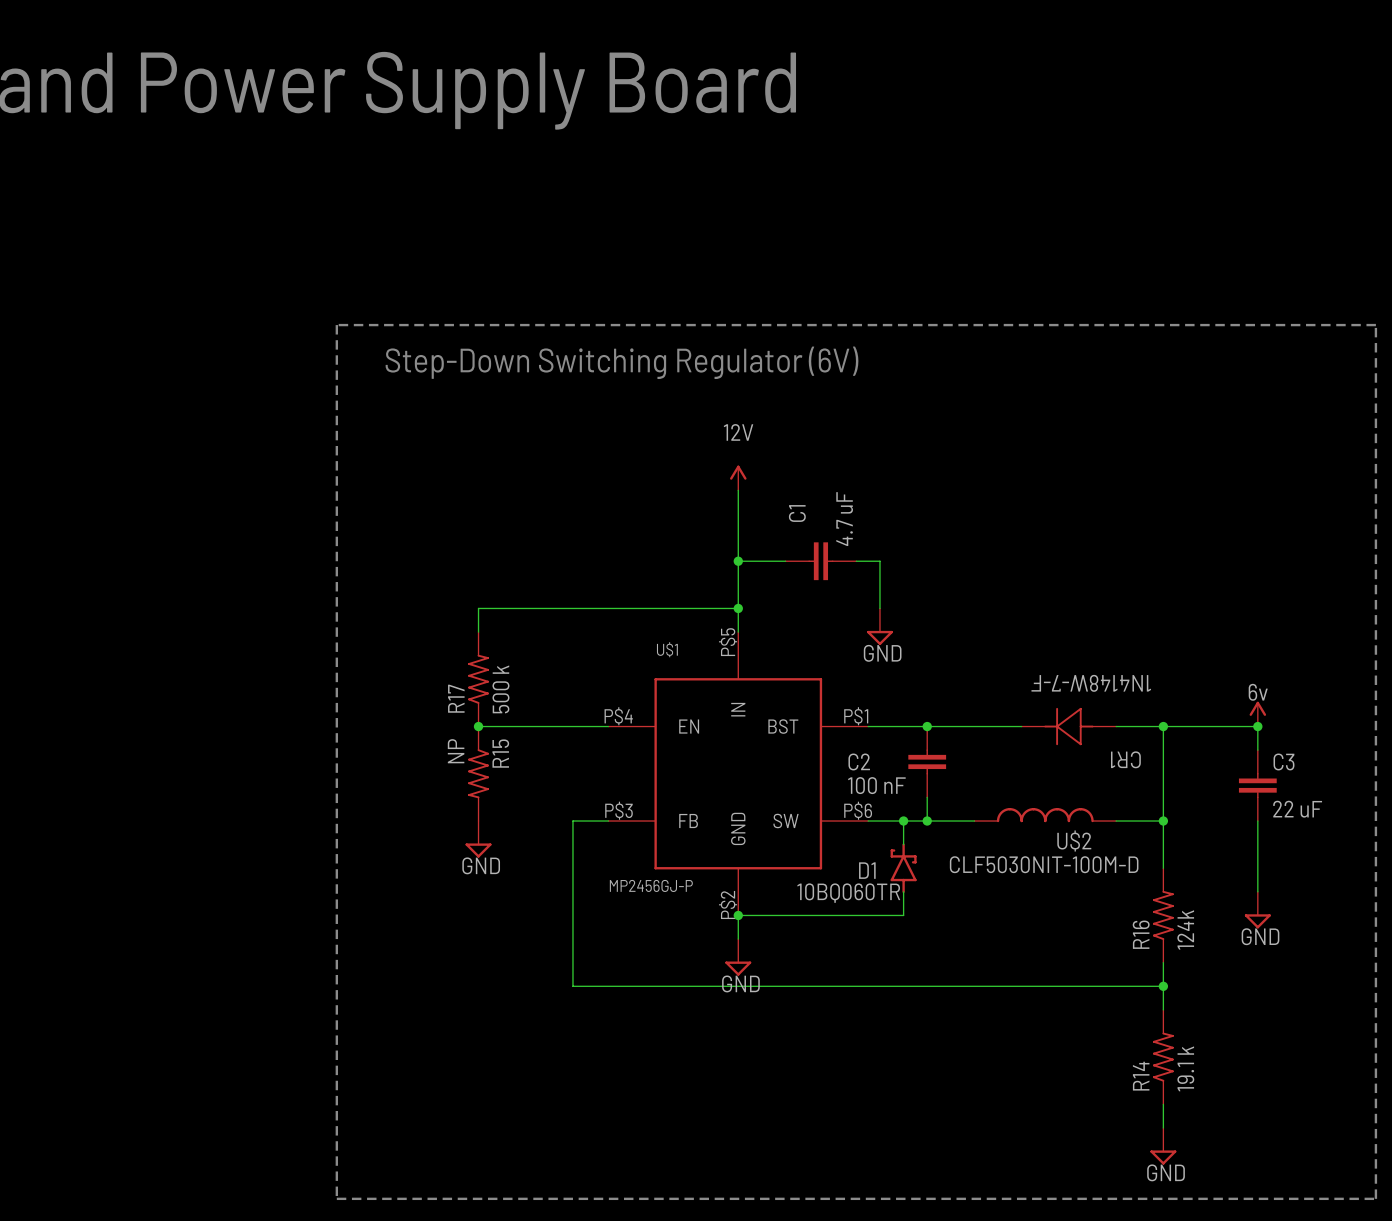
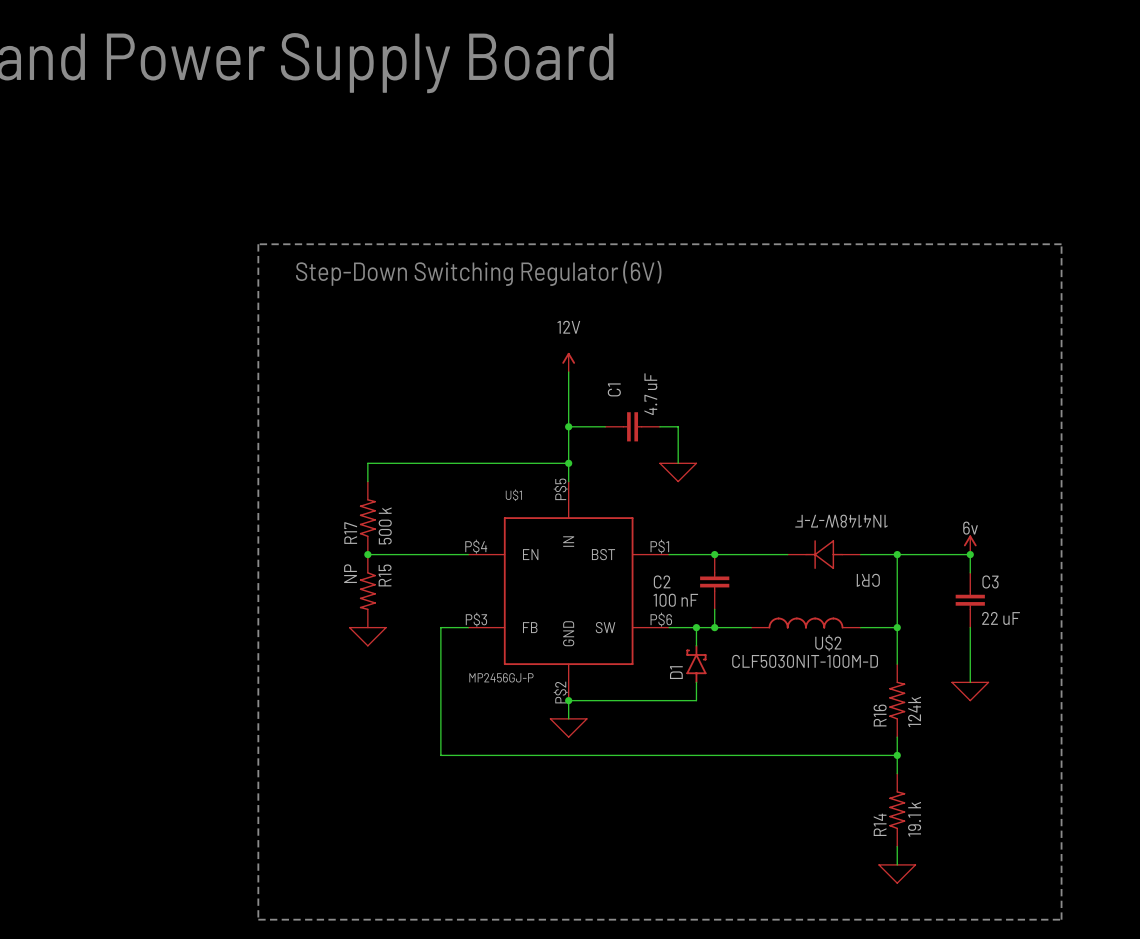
power symbol shape: [867, 608, 893, 646] -> [659, 462, 698, 483]
power symbol text: GND (882, 653) -> none
power symbol shape: [465, 821, 492, 858] -> [349, 627, 387, 647]
power symbol text: GND (481, 865) -> none
D1 name rotation: 0° (867, 870) -> 90° counterclockwise (676, 672)
power symbol shape: [1244, 891, 1271, 929] -> [951, 681, 990, 702]
D1 value: 10BQ060TR (848, 893) -> none
power symbol text: GND (1260, 936) -> none
power symbol shape: [725, 939, 752, 976] -> [549, 718, 588, 738]
power symbol text: GND (740, 983) -> none
power symbol shape: [1150, 1128, 1177, 1165] -> [878, 864, 917, 884]
power symbol text: GND (1166, 1172) -> none

